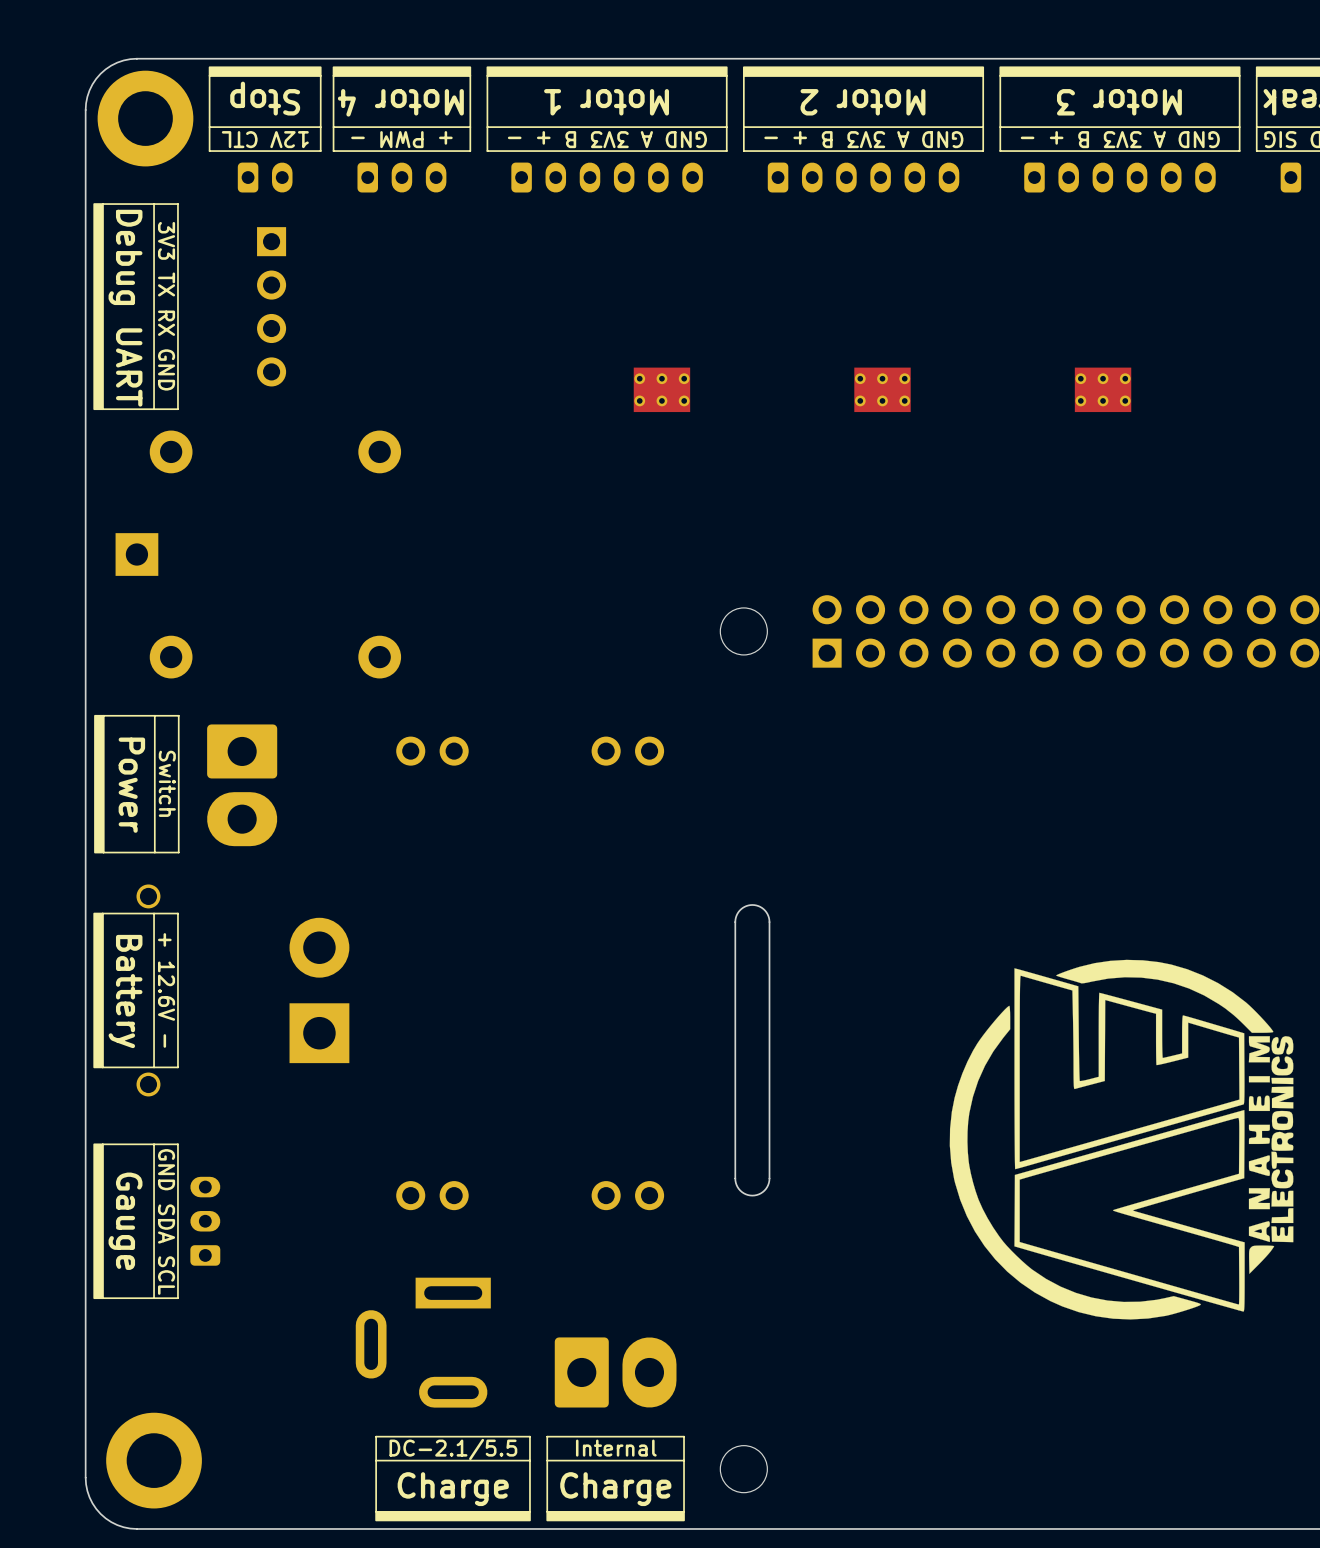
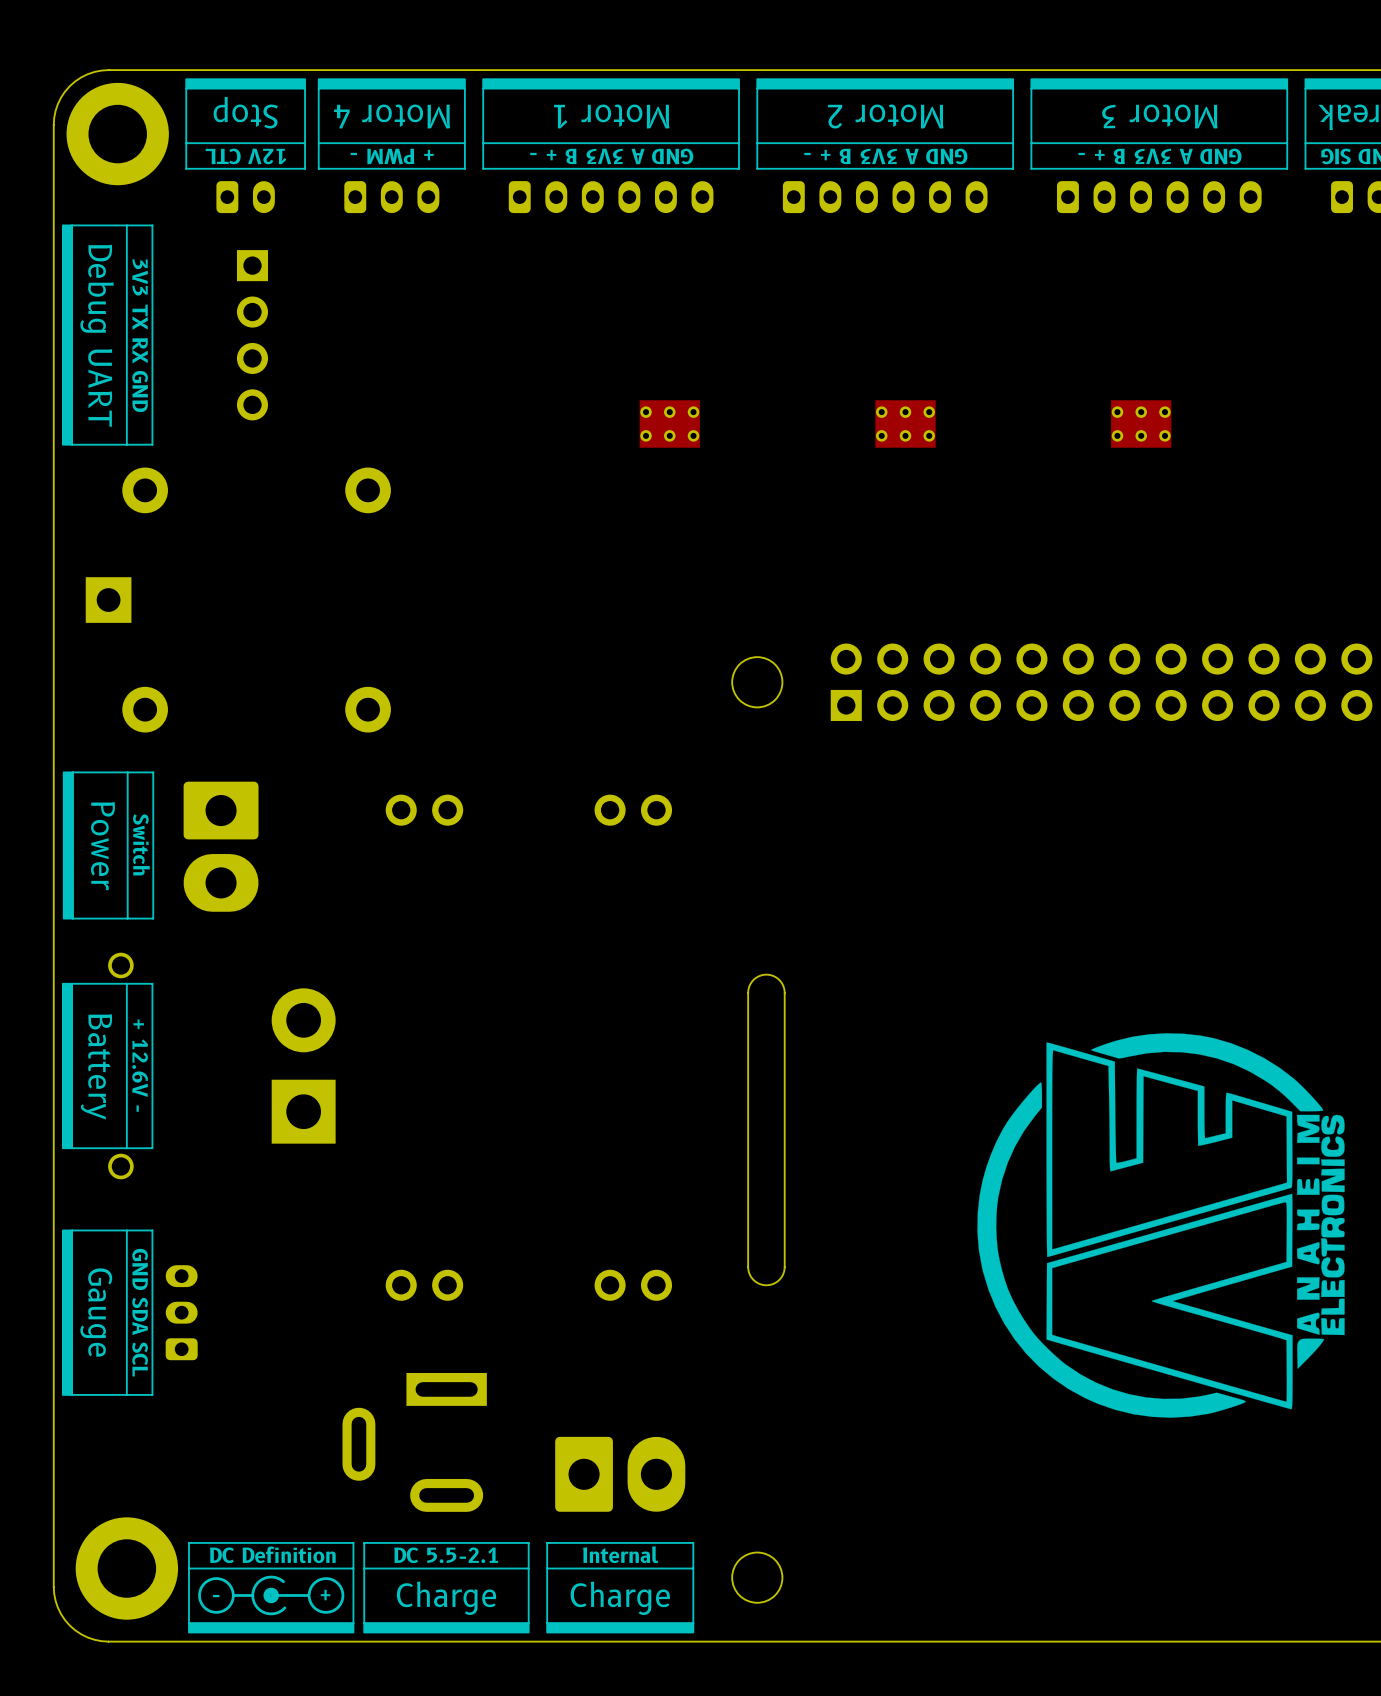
line: none -> (188, 1542) (353, 1542) (353, 1623) (188, 1623) (188, 1542)
text: none -> DC Definition (272, 1554)
text: DC-2.1/5.5 (453, 1449) -> DC 5.5-2.1 (446, 1555)
line: none -> (188, 1568) (353, 1568)
drawing: none -> [188, 1575, 355, 1634]
text: none -> - (216, 1596)
text: none -> + (325, 1595)

